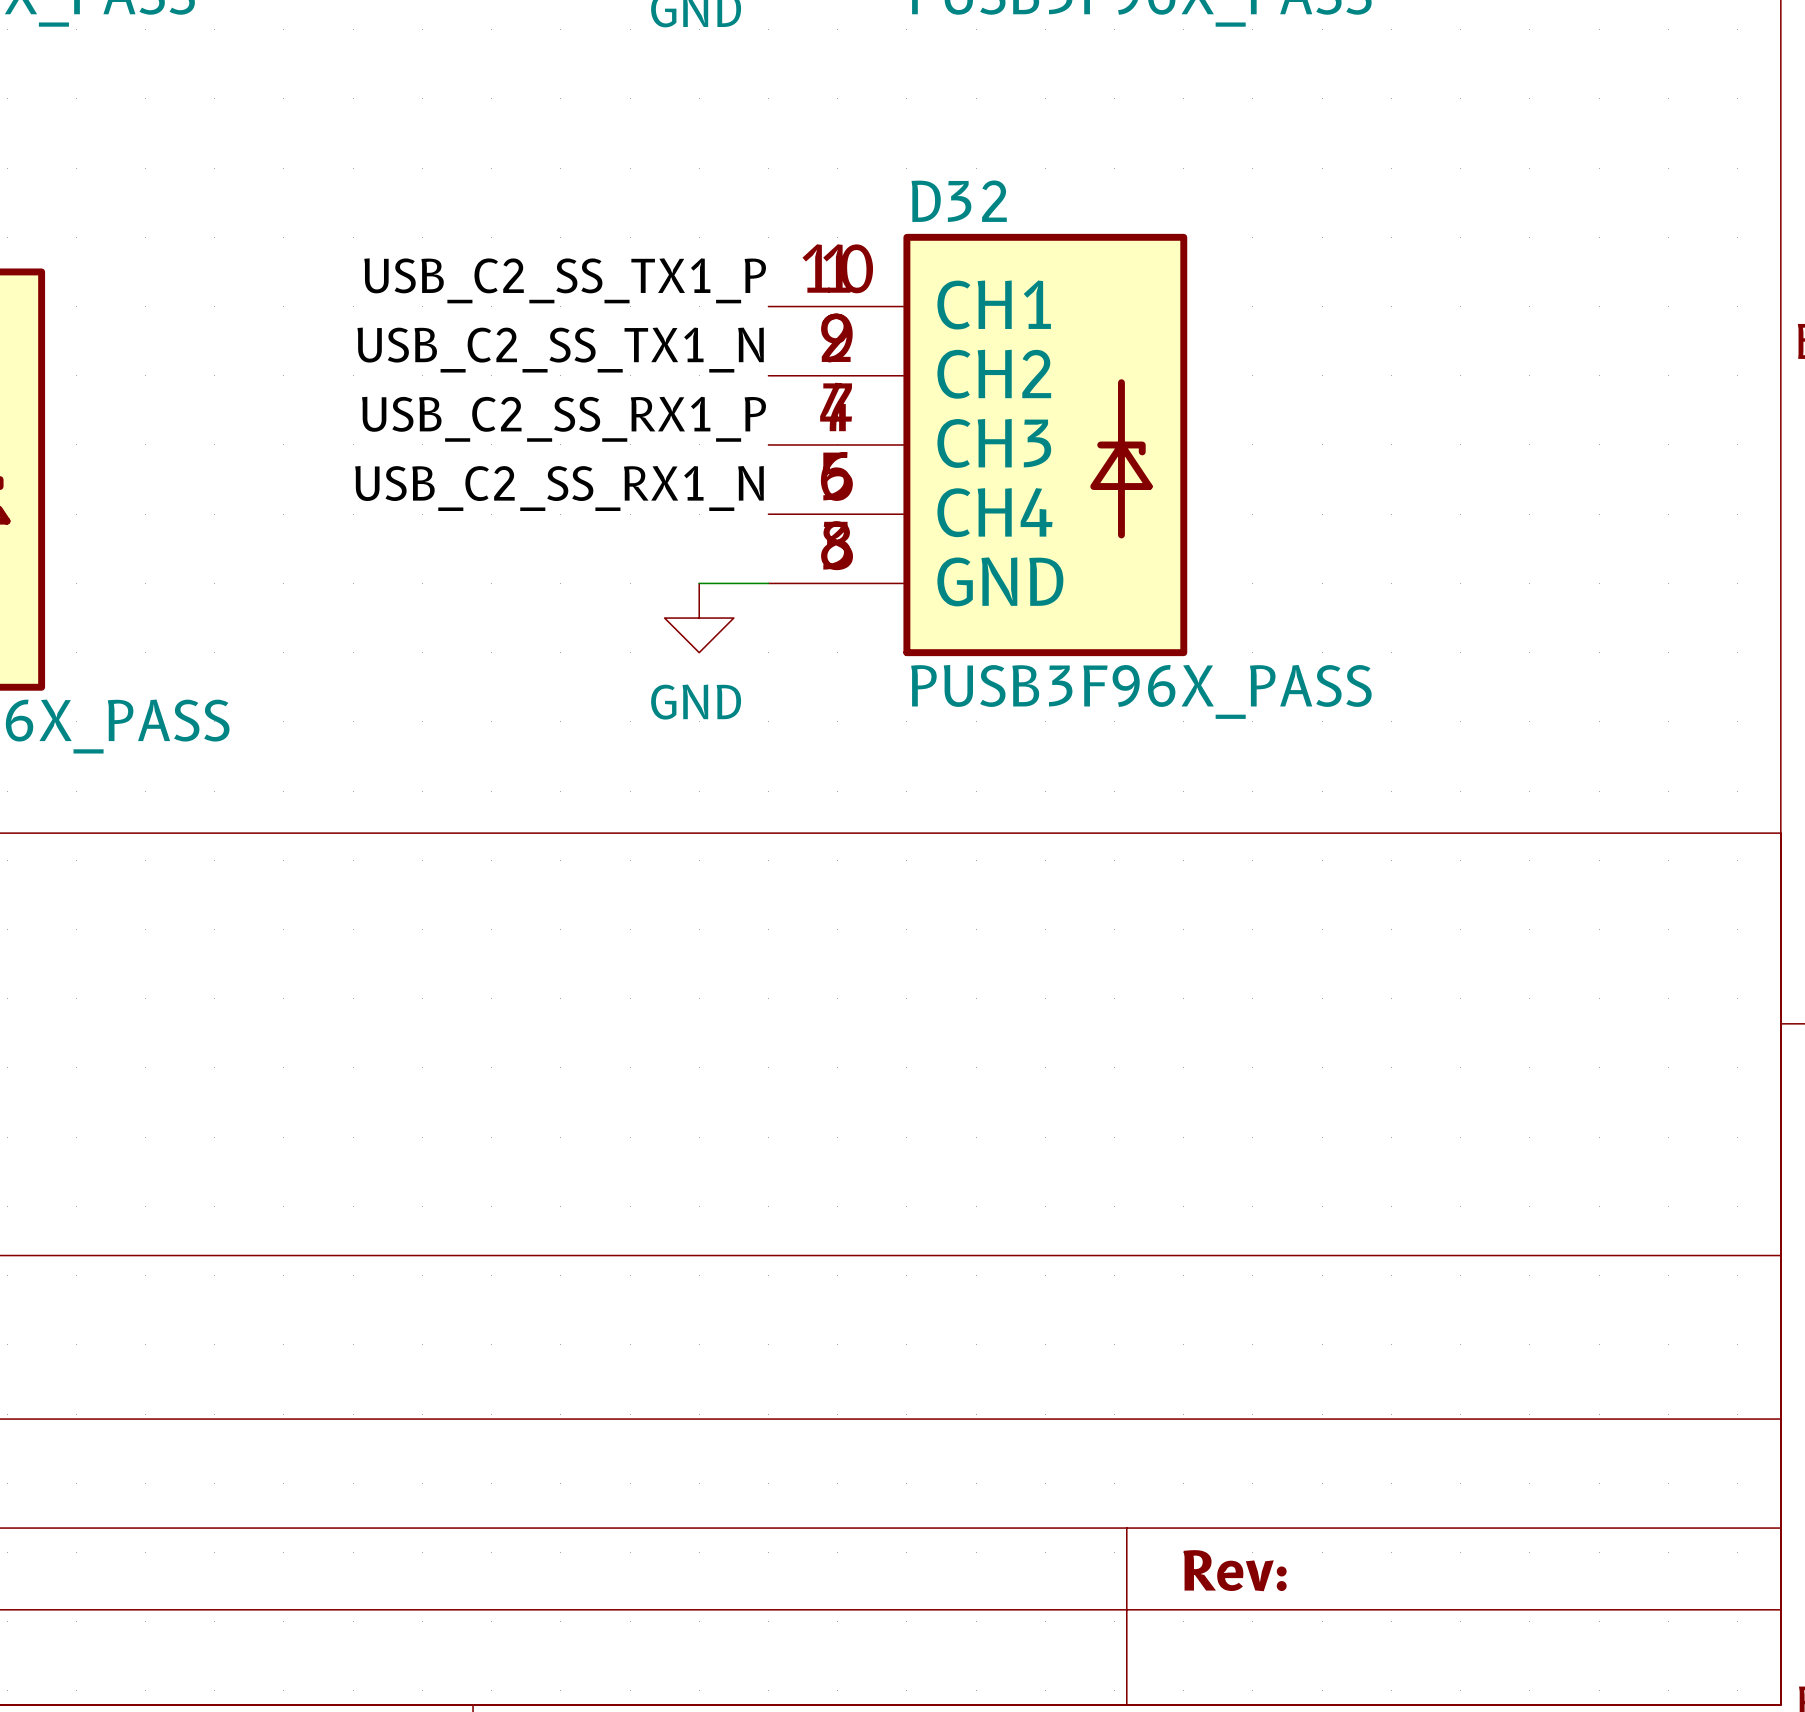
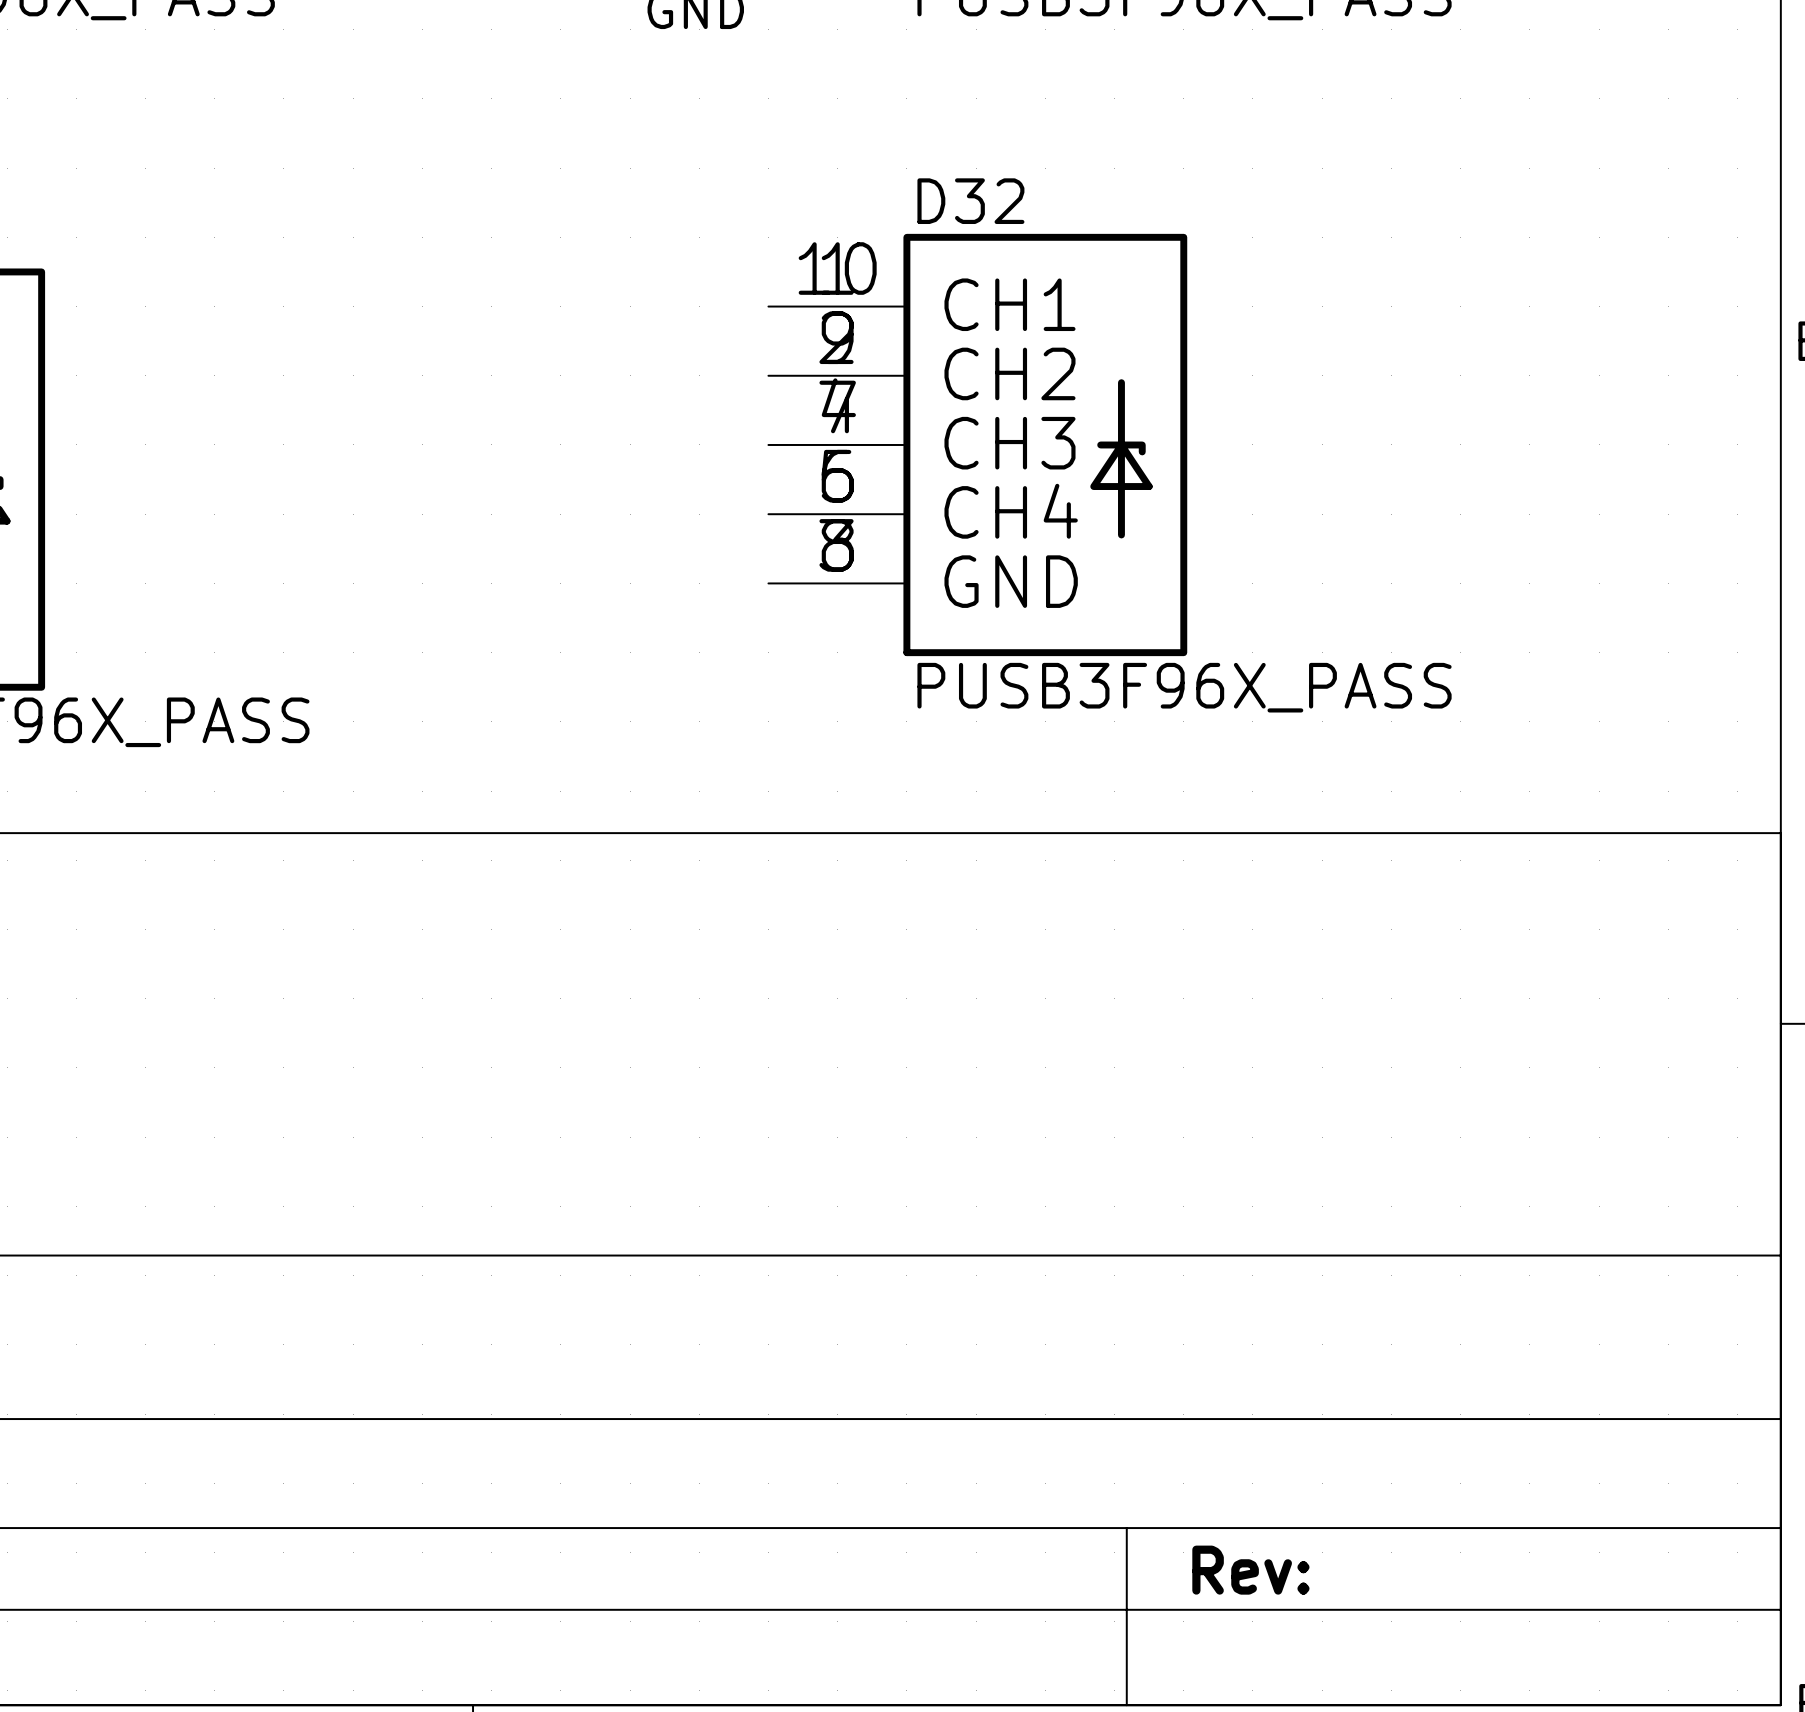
label: USB_C2_SS_TX1_P (565, 280) -> none
label: USB_C2_SS_TX1_N (560, 350) -> none
label: USB_C2_SS_RX1_P (563, 419) -> none
label: USB_C2_SS_RX1_N (559, 488) -> none
wire: (699, 583) (768, 583) -> none
power symbol: GND (699, 618) -> none

